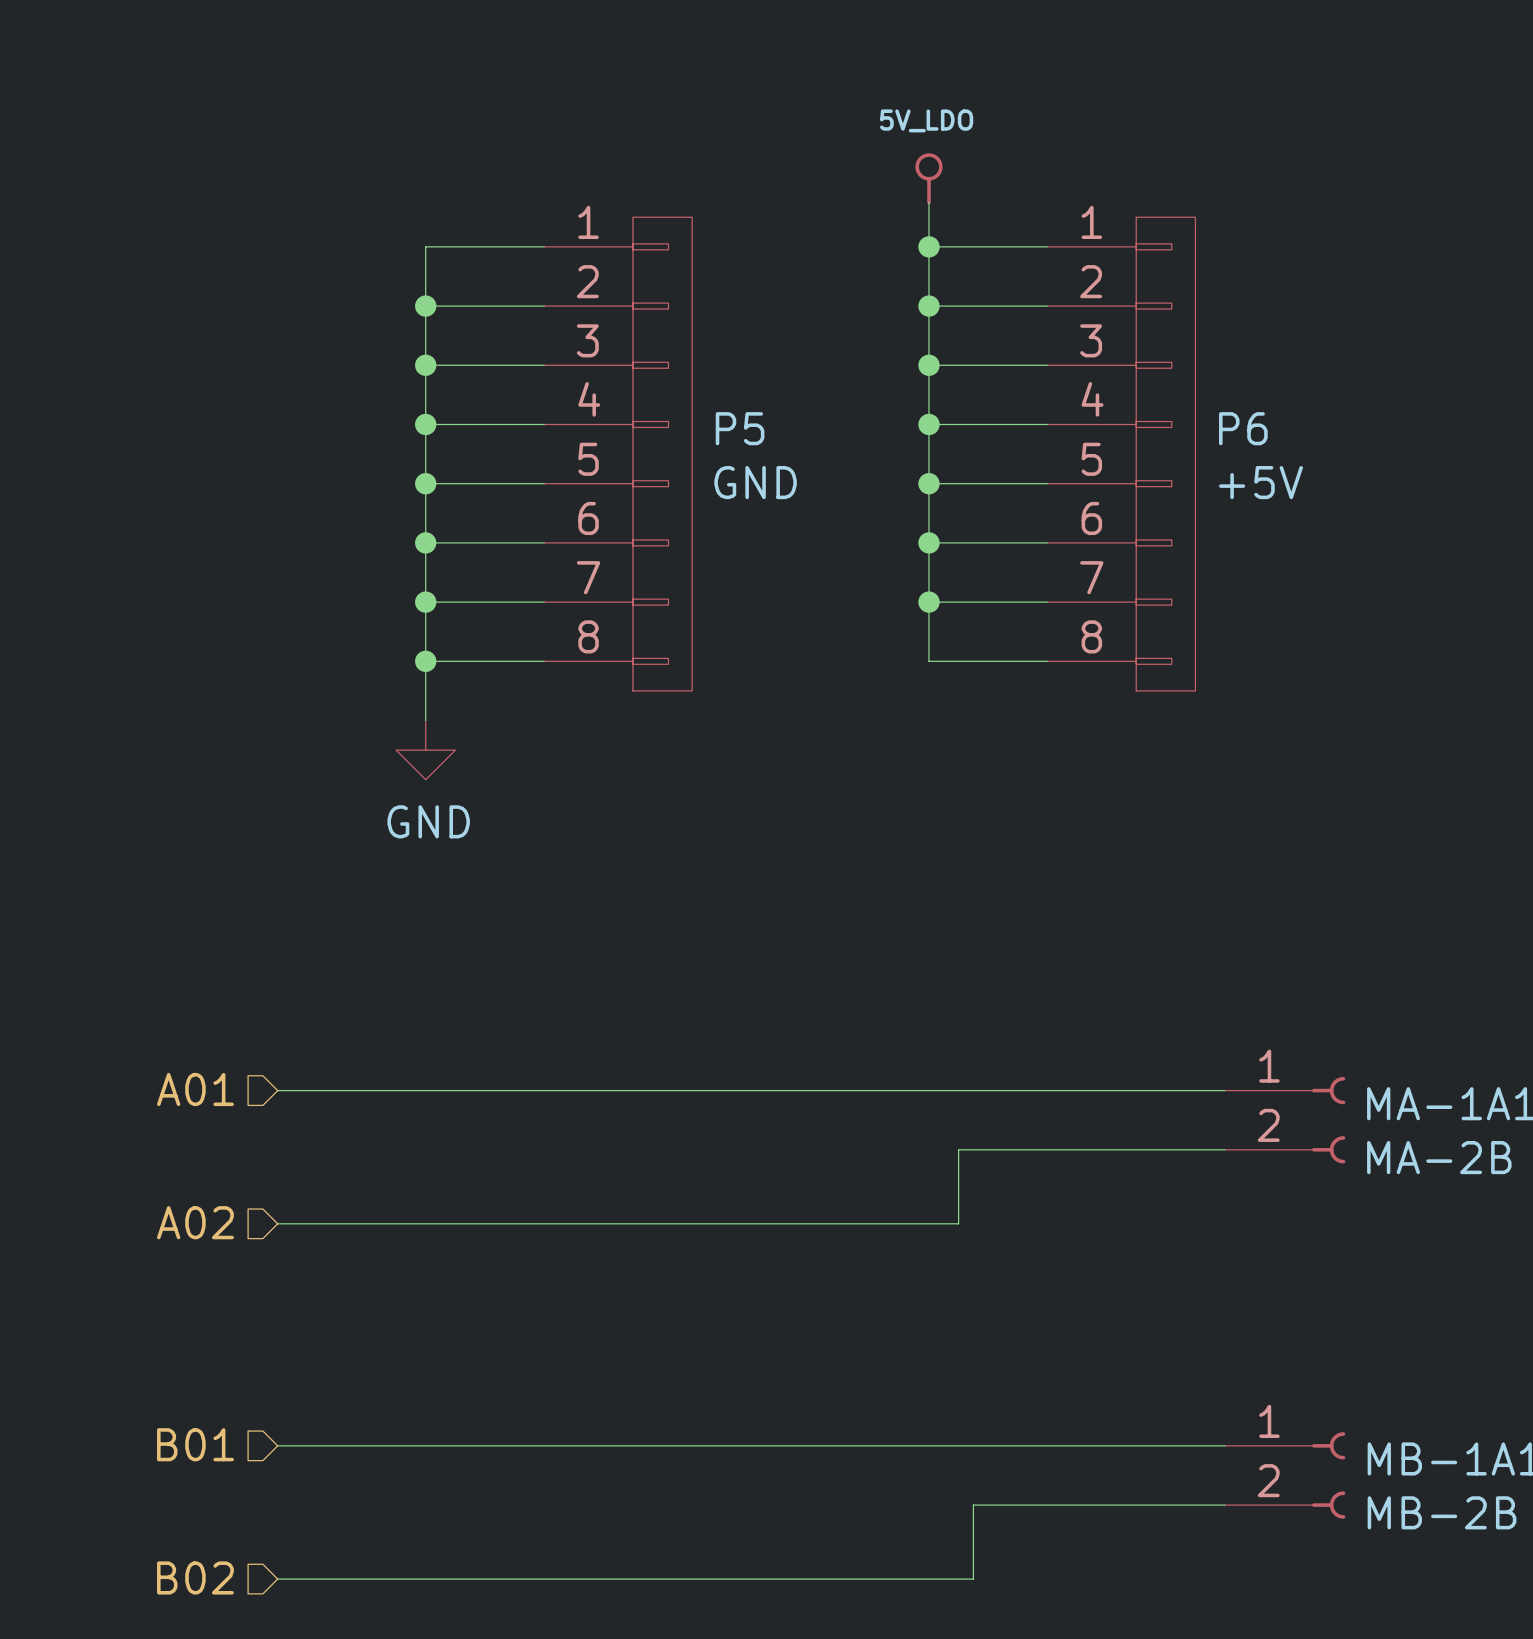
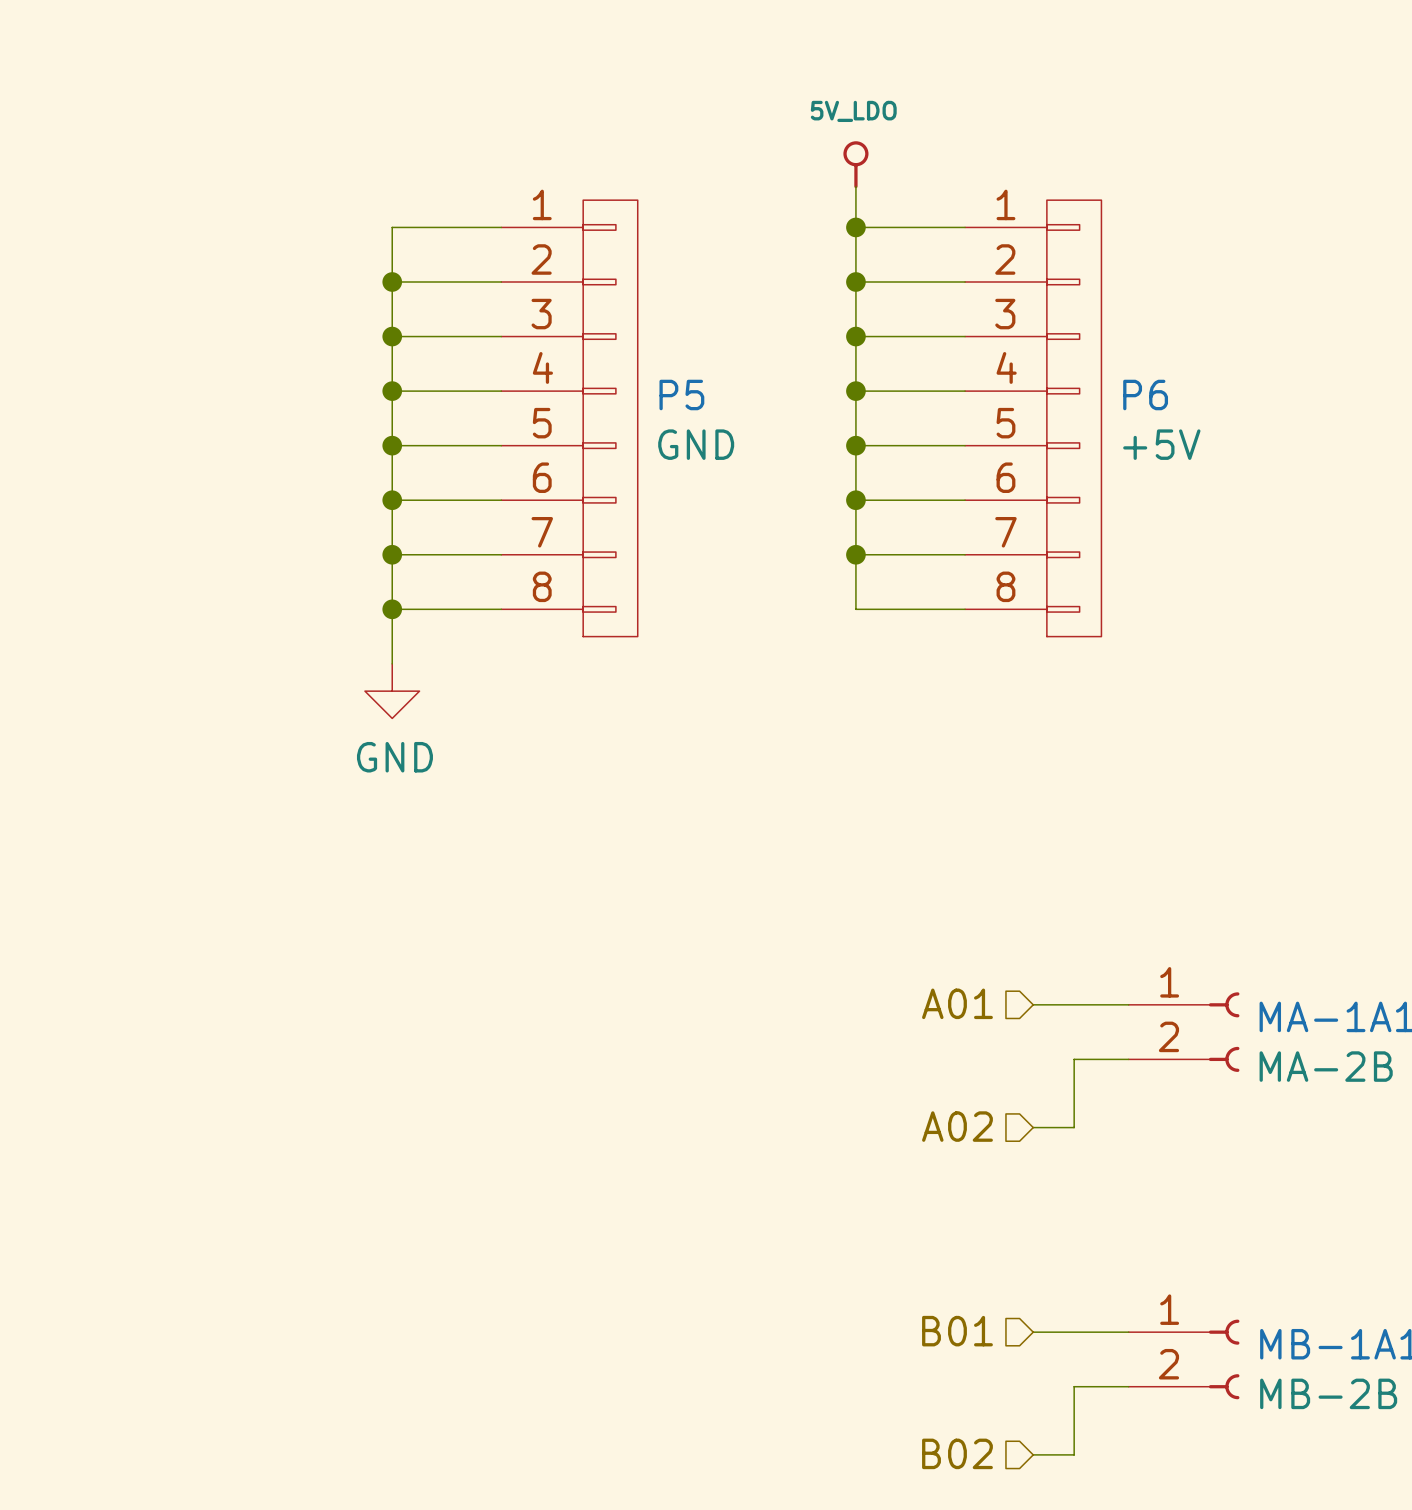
hierarchical label: A01 (195, 1089) -> none
hierarchical label: none -> A01 (957, 1003)
wire: (277, 1090) (1121, 1090) -> none
wire: (1165, 1149) (958, 1149) (958, 1223) (277, 1223) -> (1074, 1059) (1074, 1127) (1033, 1127)
hierarchical label: A02 (195, 1222) -> none
hierarchical label: none -> A02 (957, 1126)
hierarchical label: B01 (195, 1444) -> none
hierarchical label: none -> B01 (957, 1331)
wire: (277, 1445) (1121, 1445) -> none
wire: (1165, 1505) (973, 1505) (973, 1579) (277, 1579) -> (1074, 1386) (1074, 1454) (1033, 1454)
hierarchical label: B02 (195, 1577) -> none
hierarchical label: none -> B02 (957, 1453)

